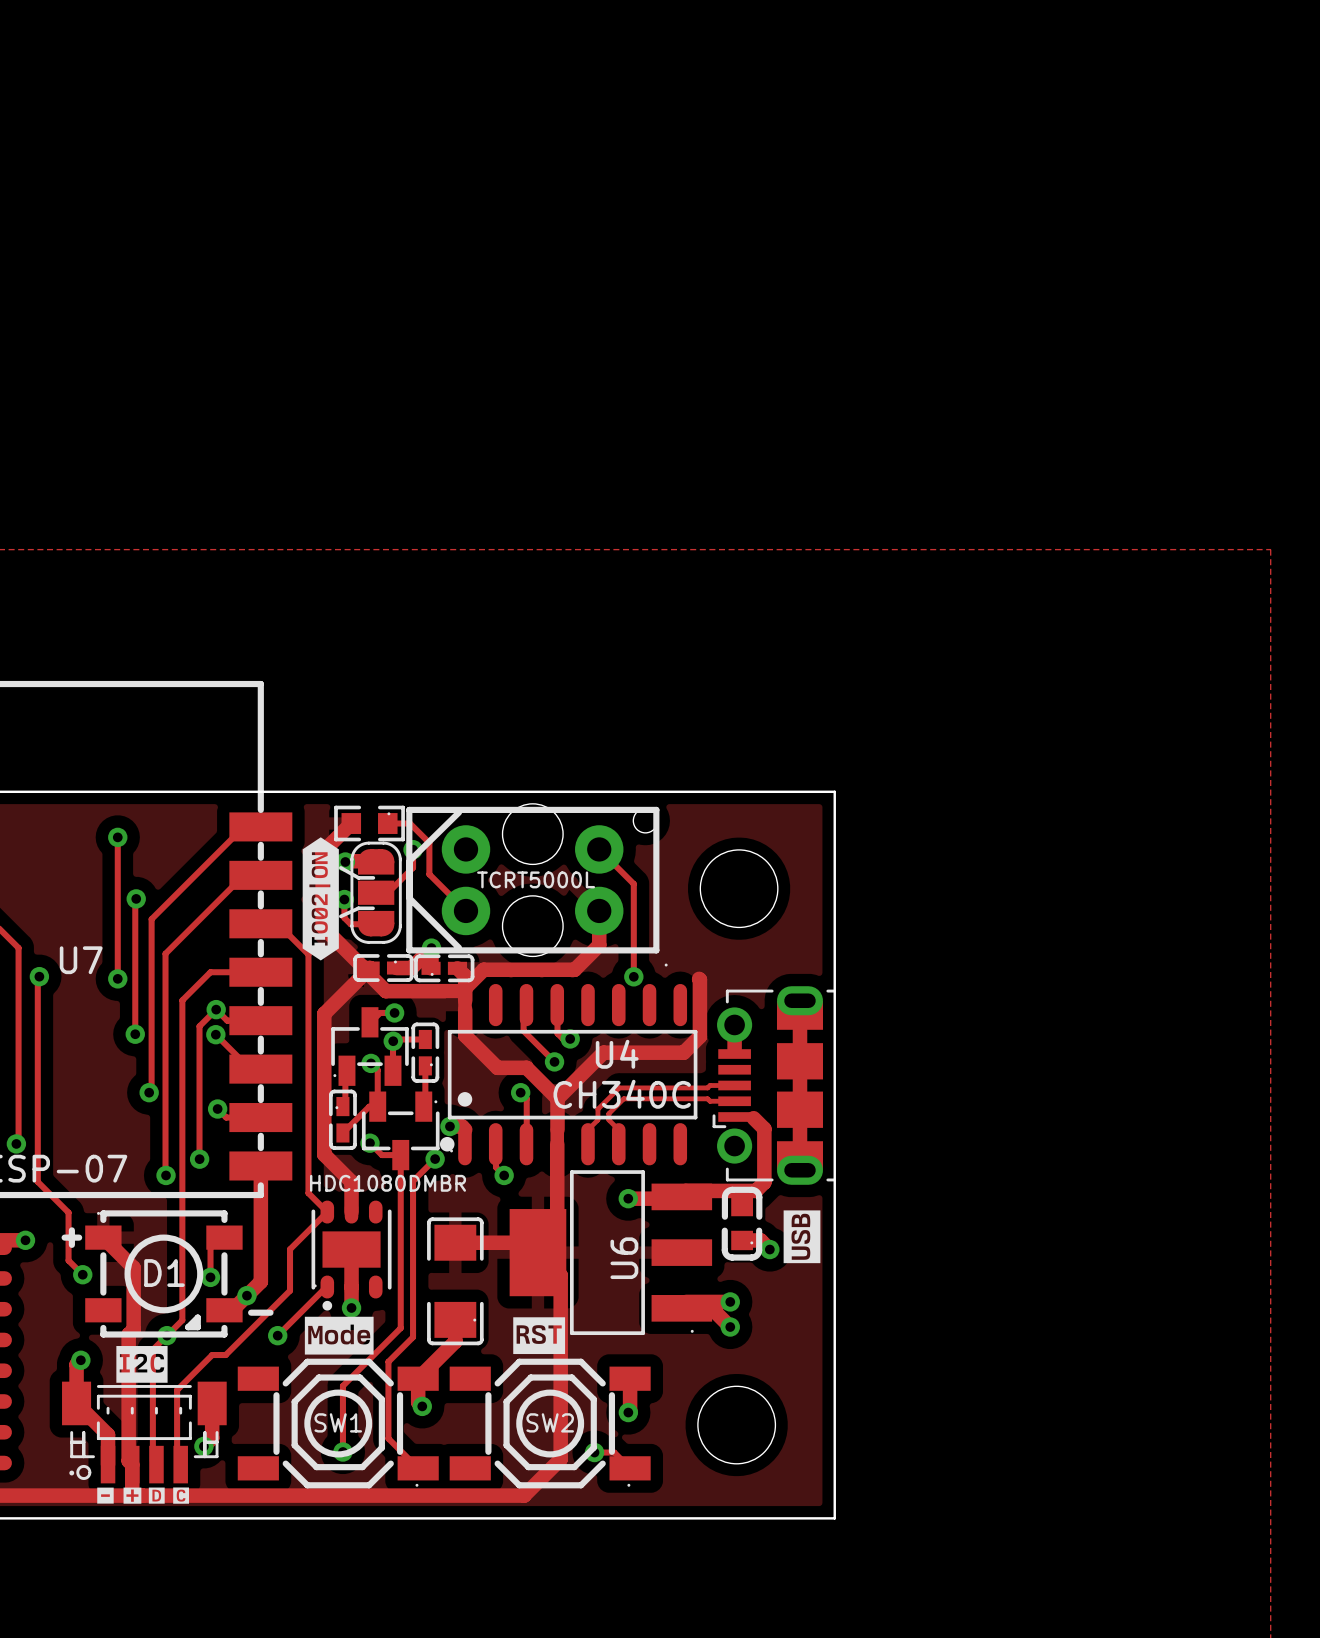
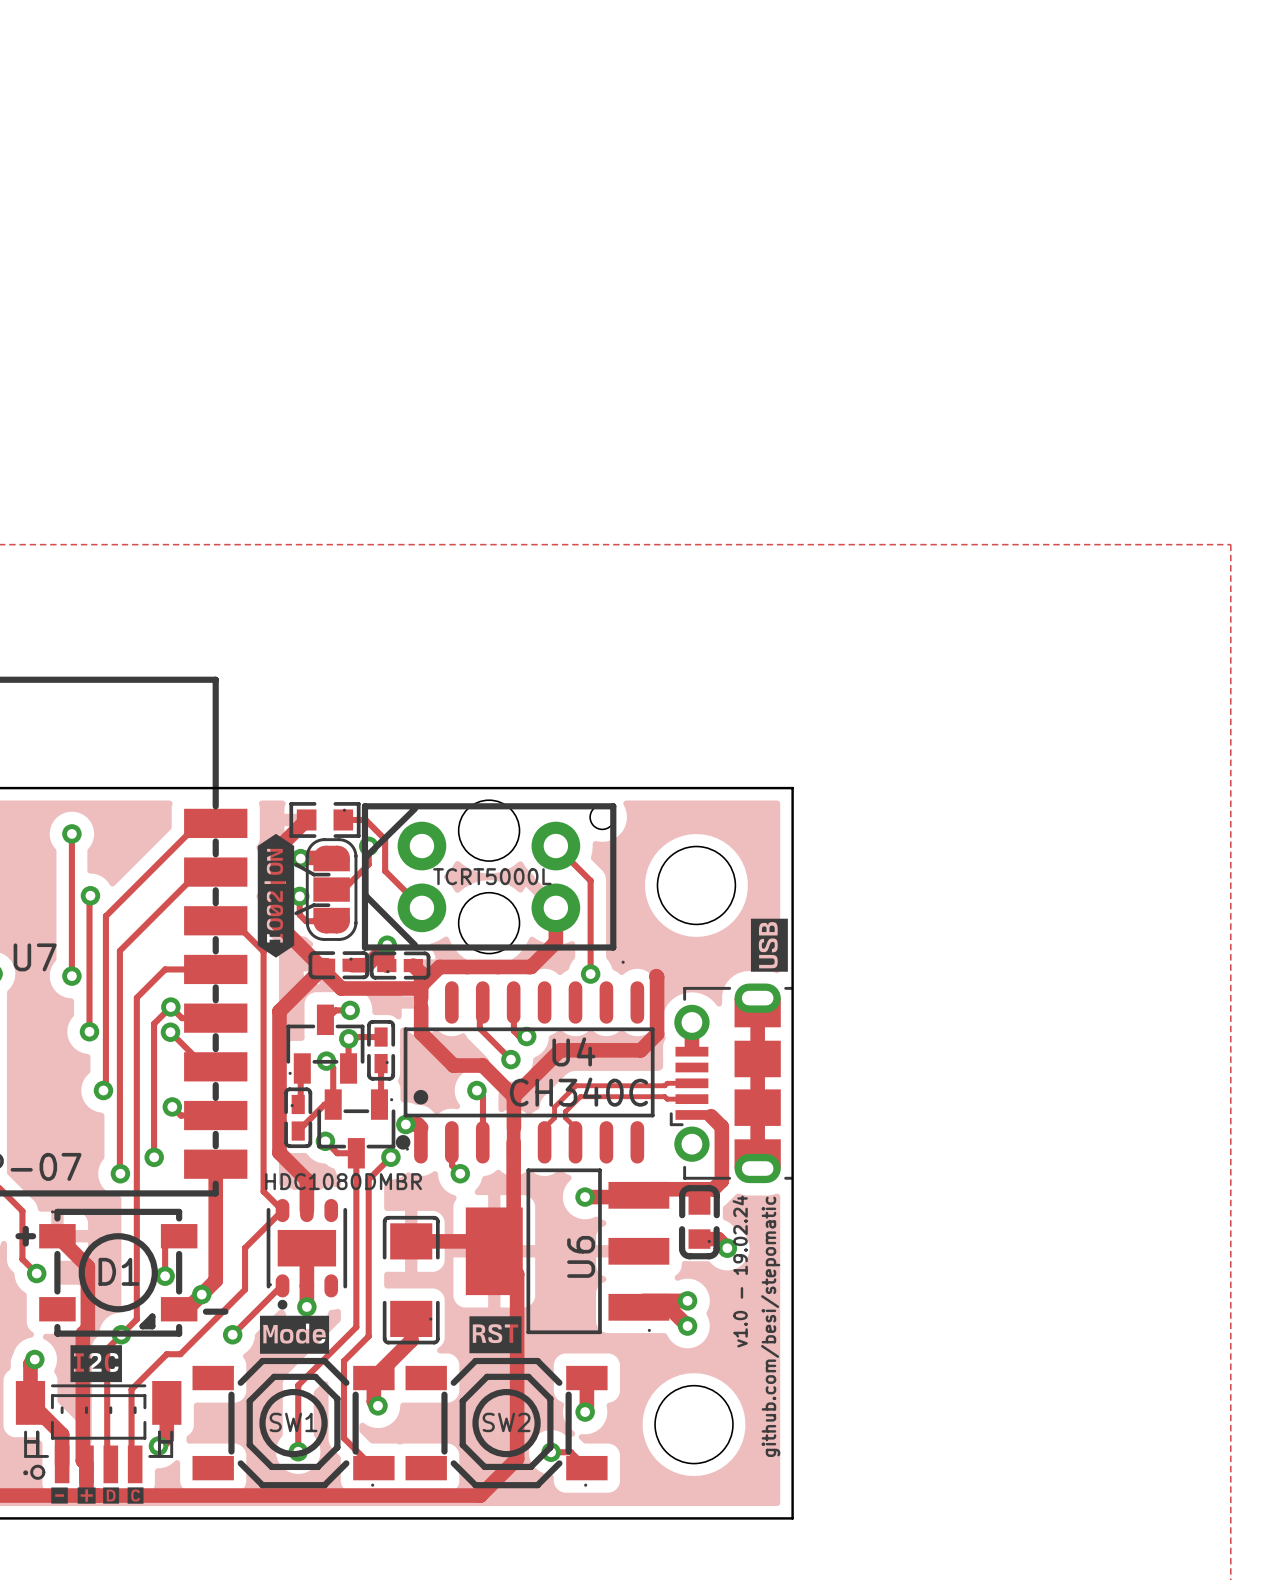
drawing position: (802, 1236) -> (769, 945)
text: none -> v1.0 - 19.02.24 (740, 1271)
text: none -> github.com/besi/stepomatic (770, 1326)

